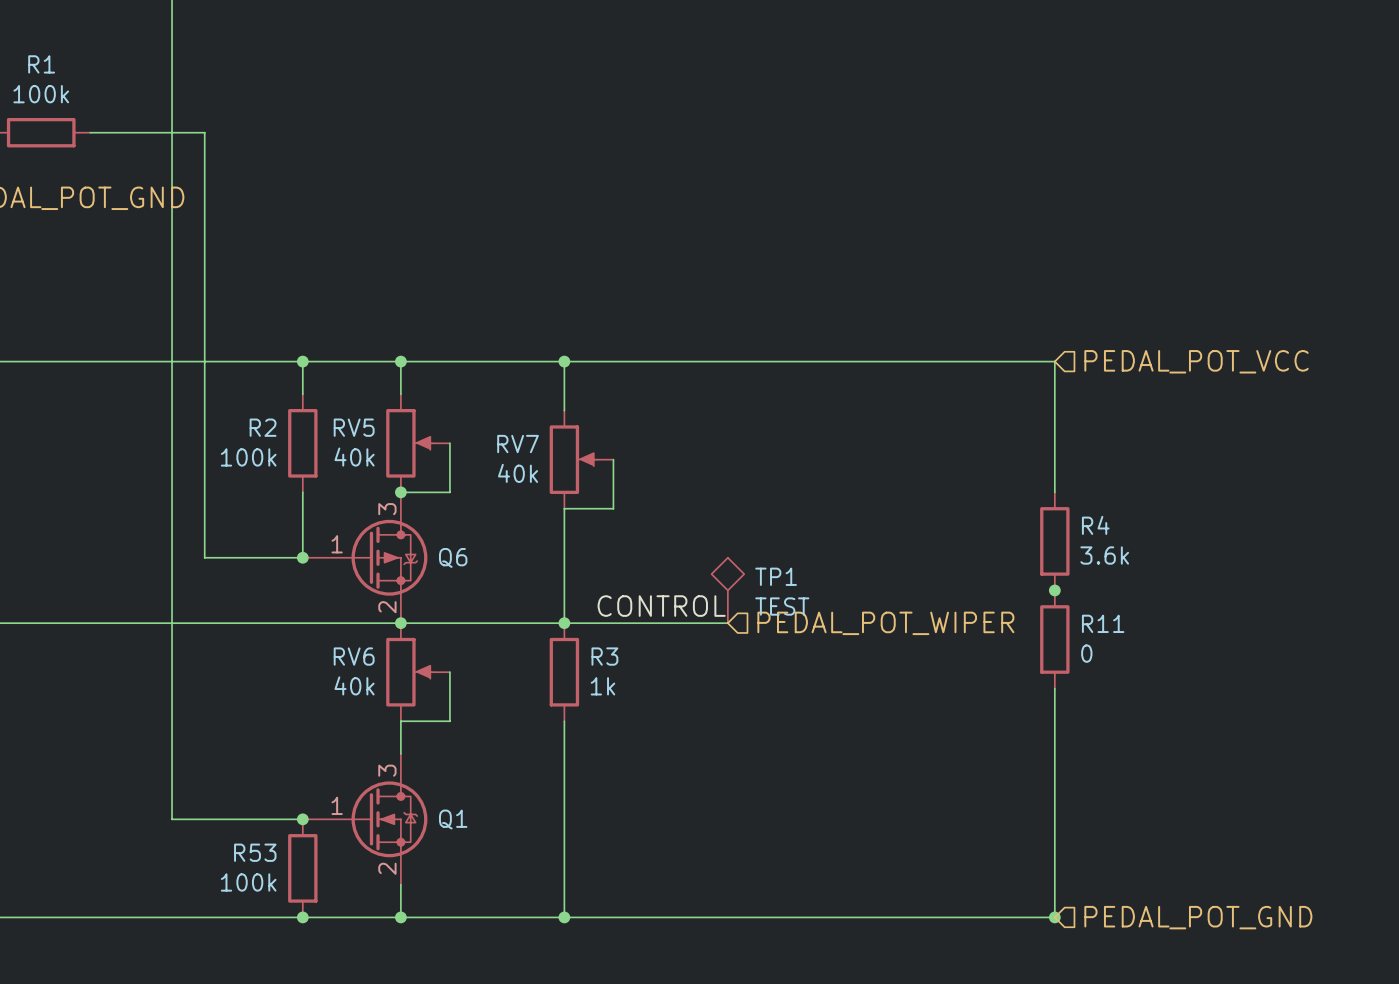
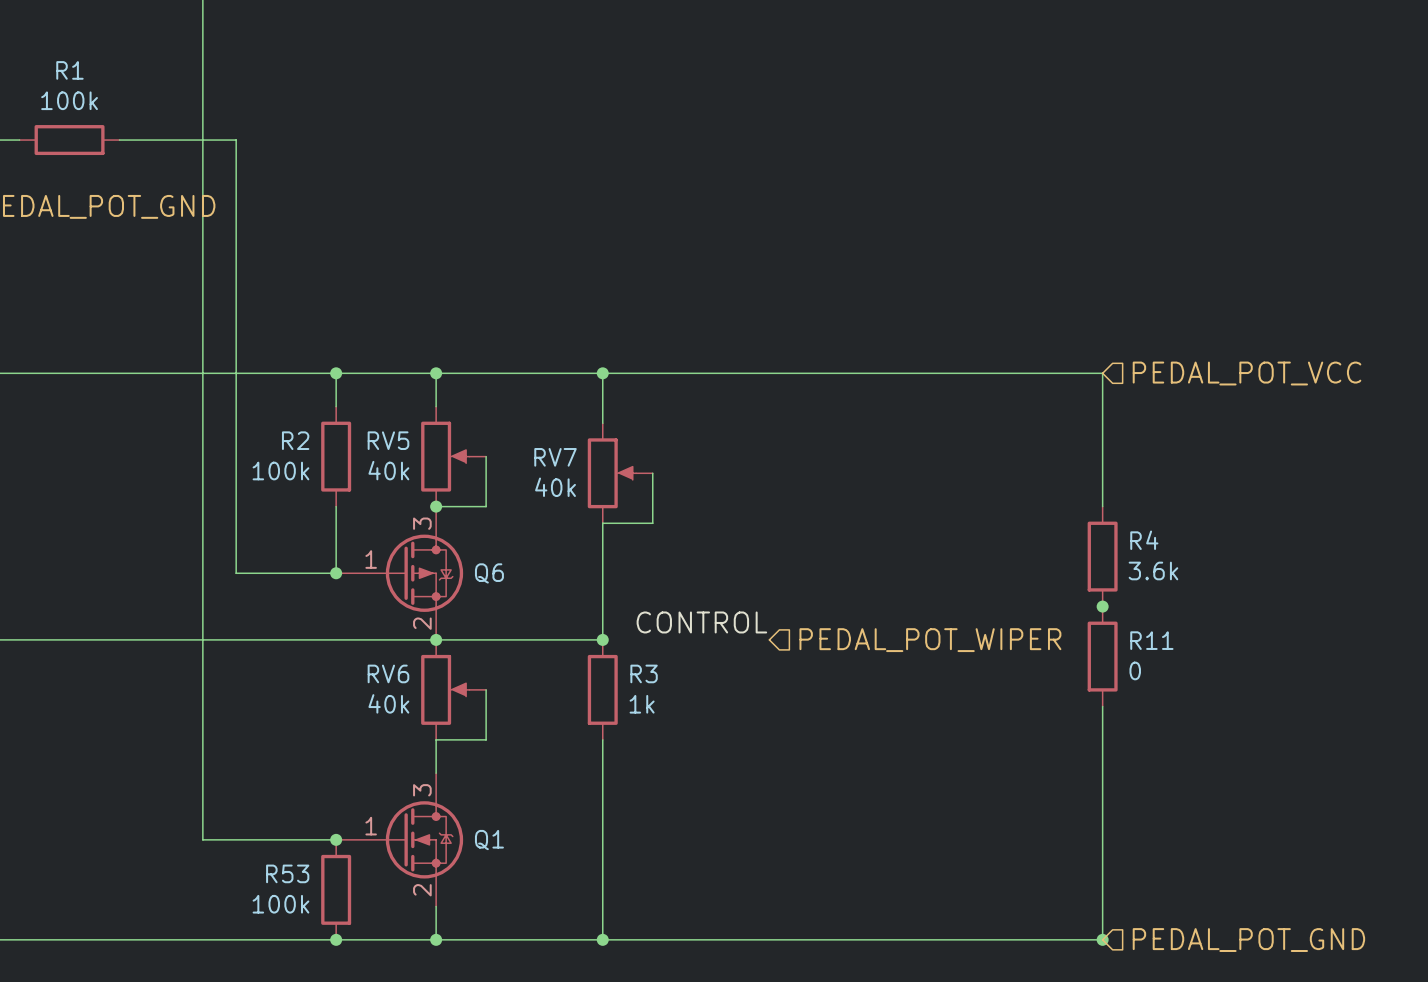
TP1: TEST (727, 590) -> none
wire: (564, 623) (727, 623) -> none

